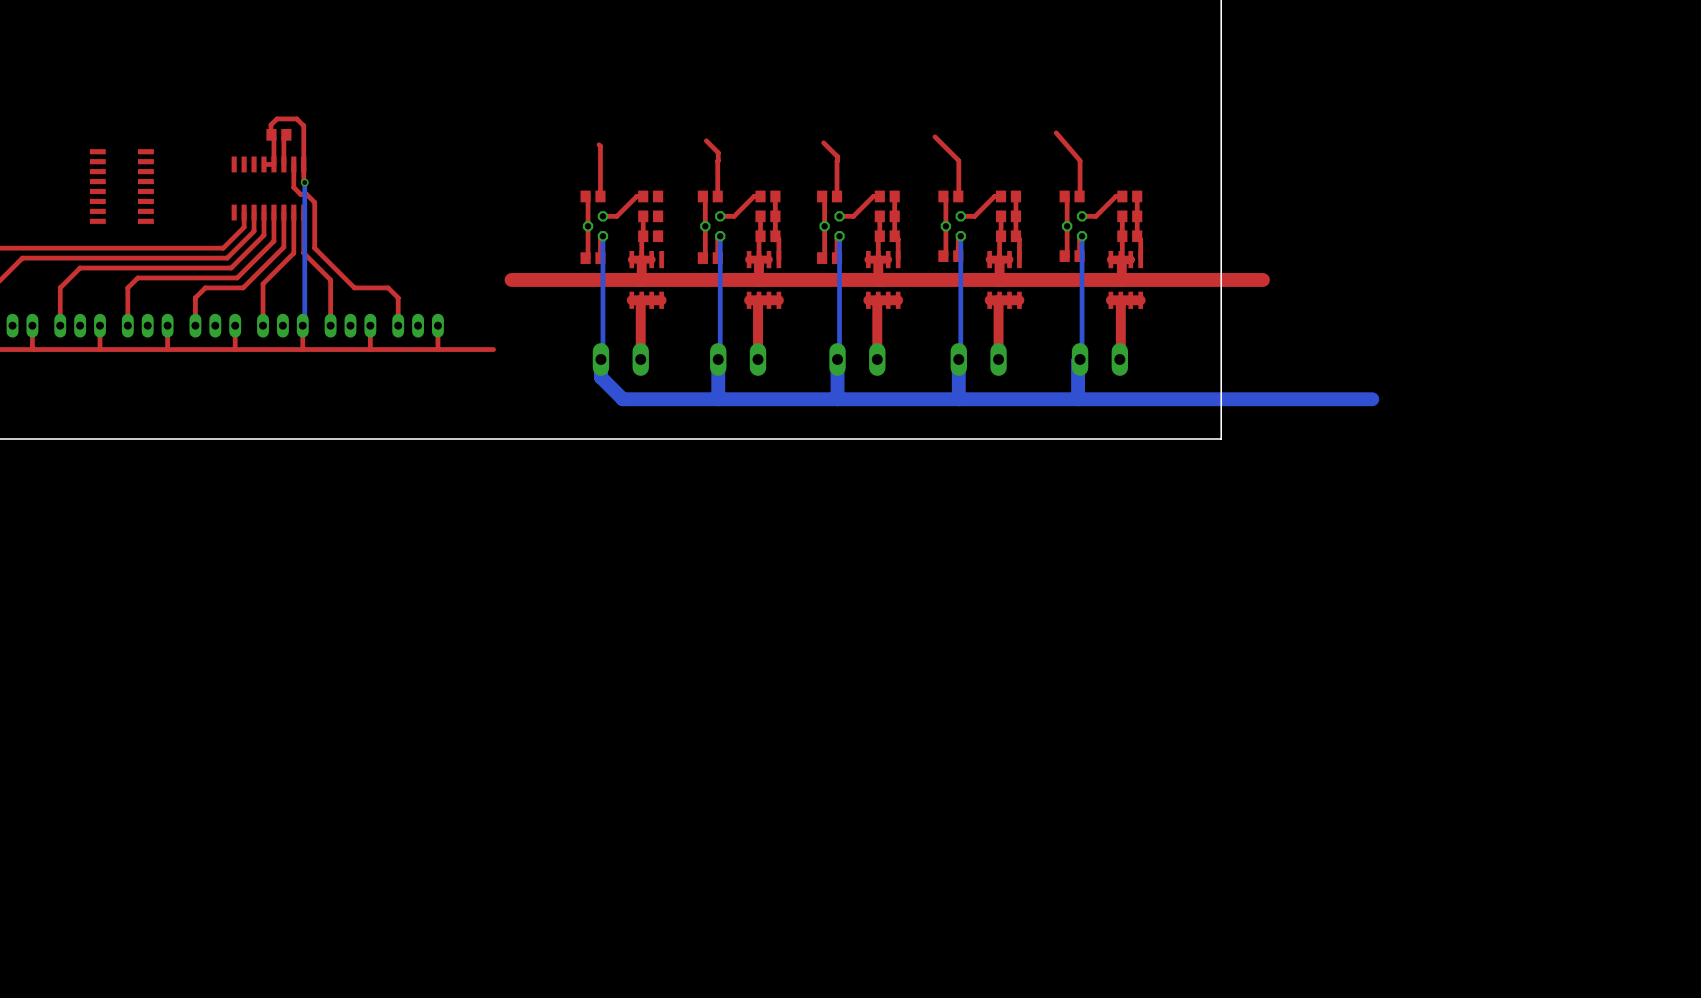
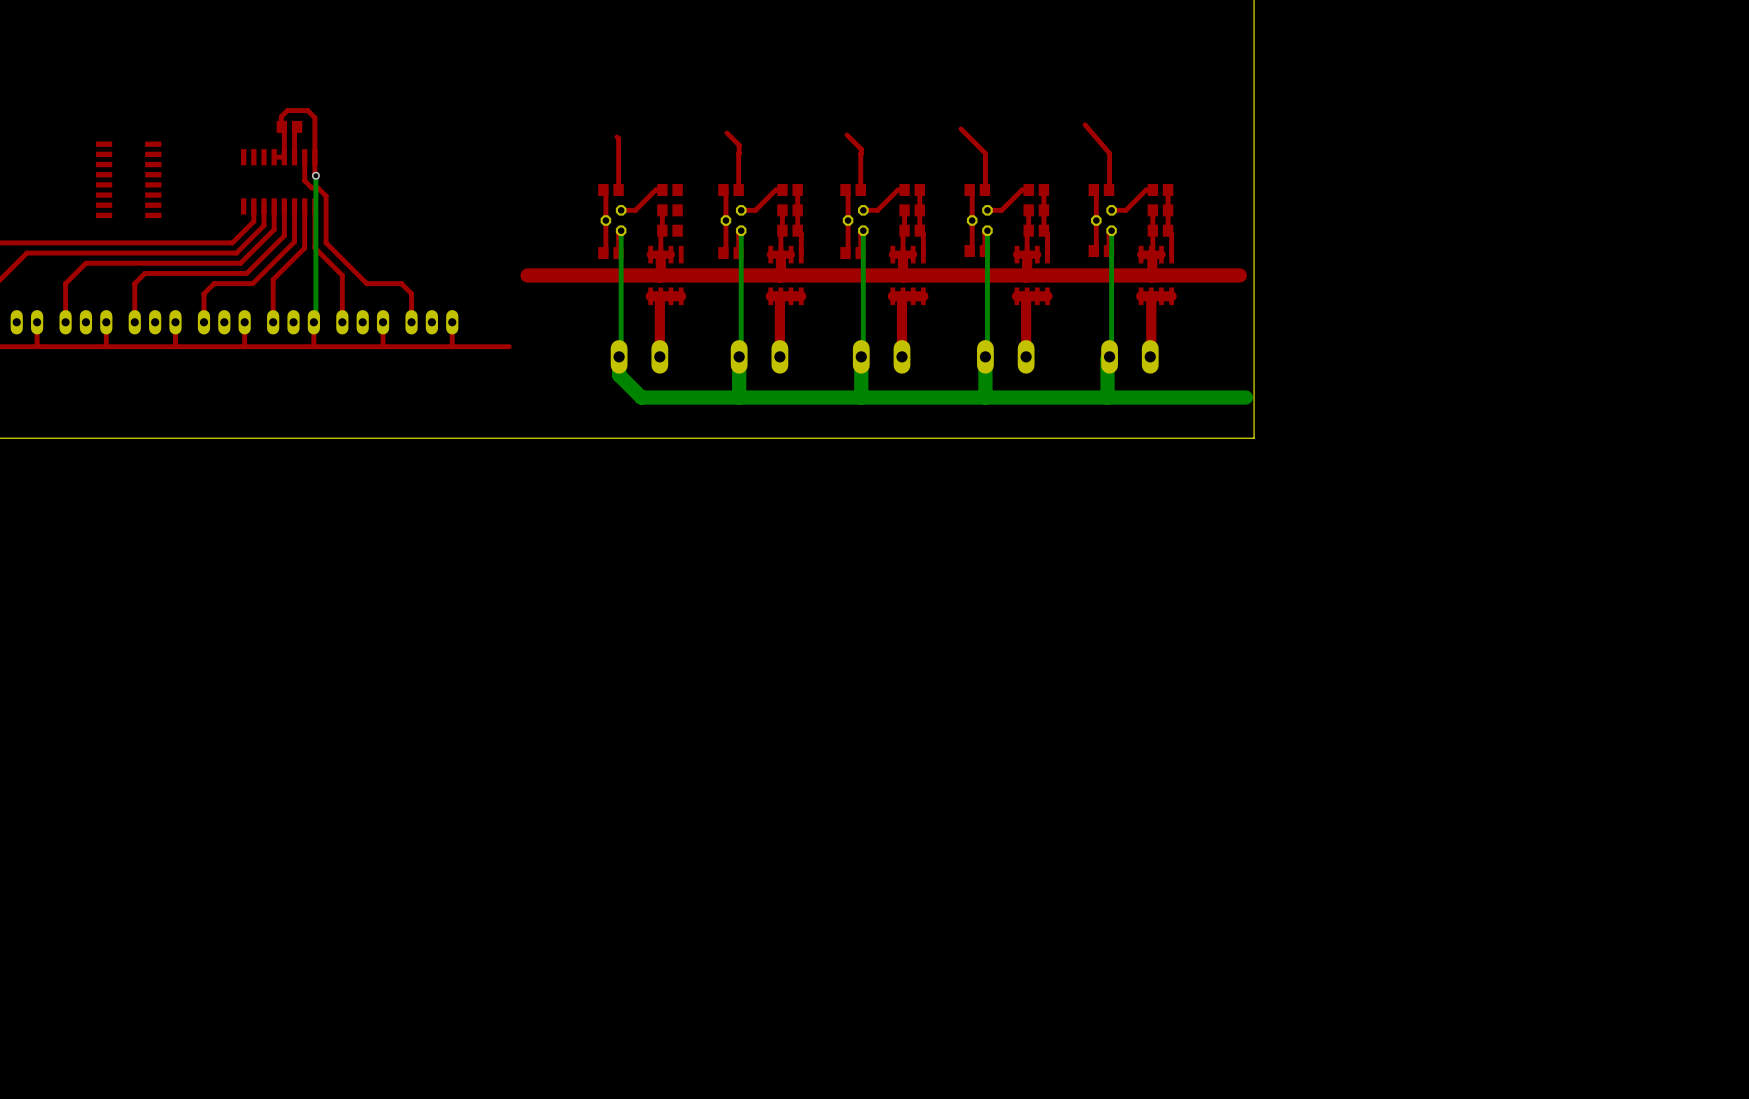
top track: (1262, 279) (1207, 279) -> none
bottom track: (1372, 399) (1213, 399) -> none

